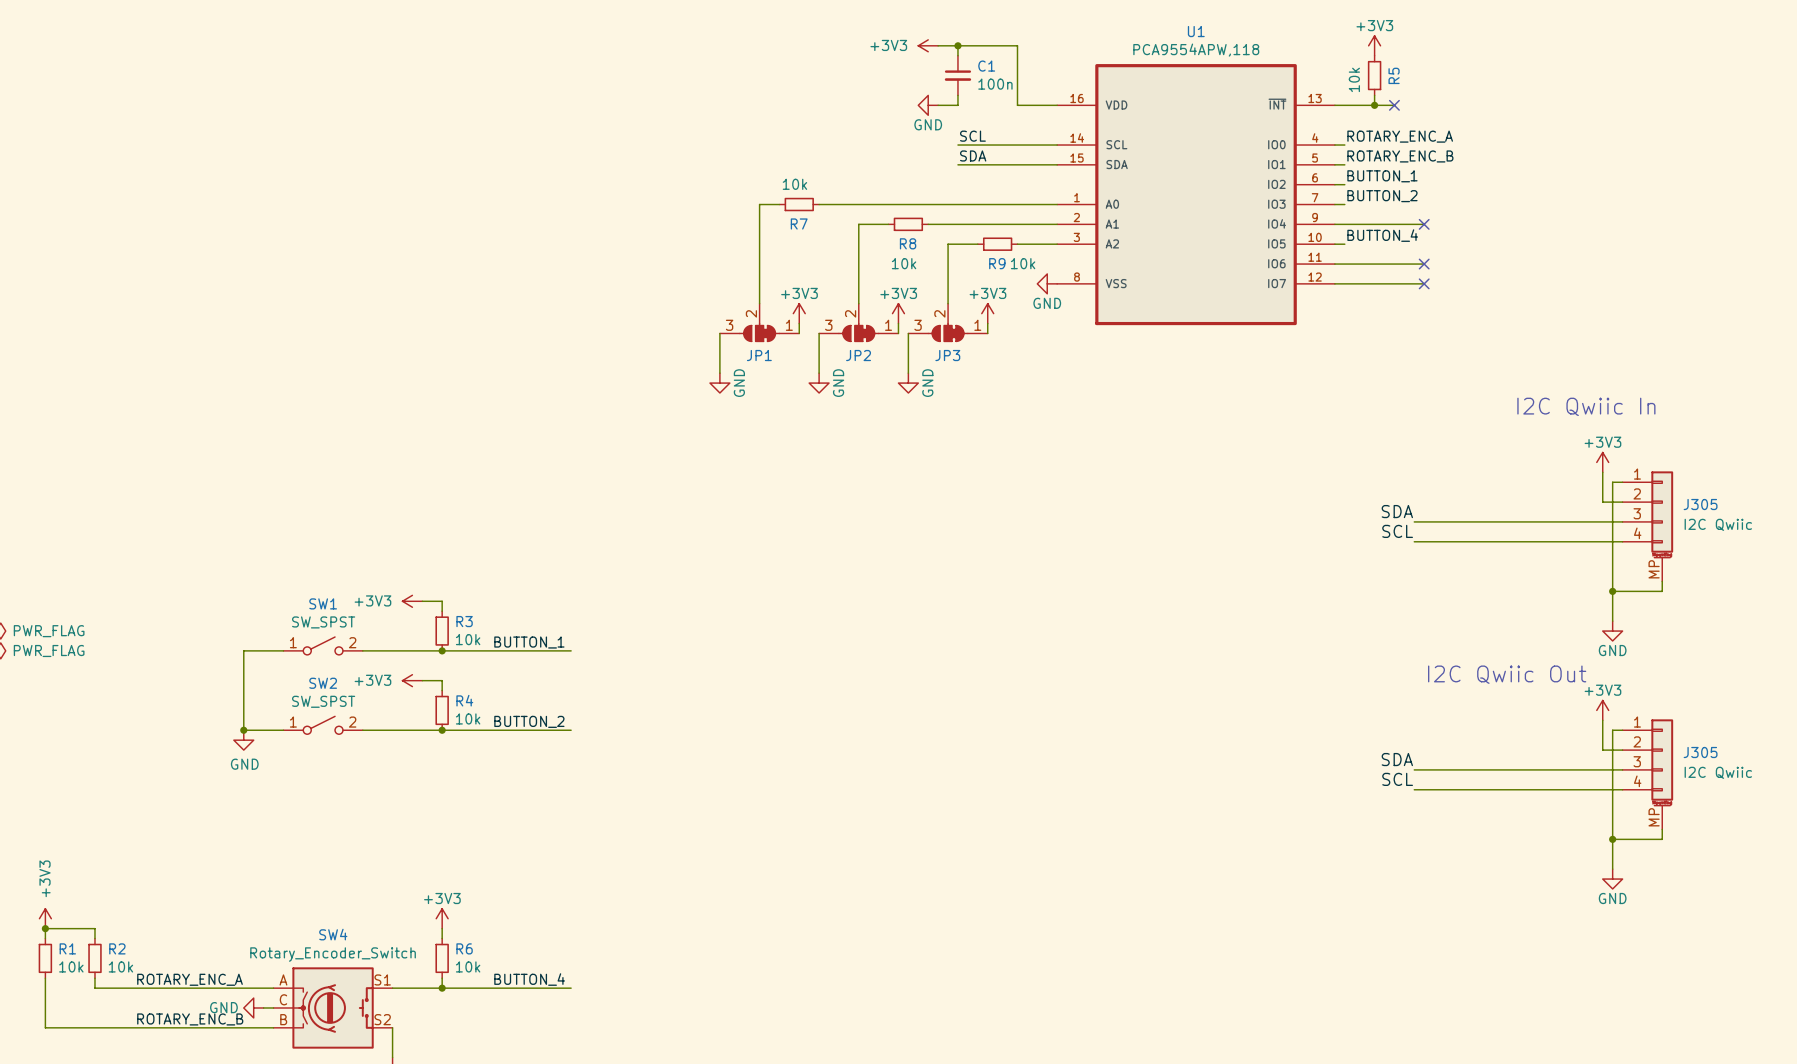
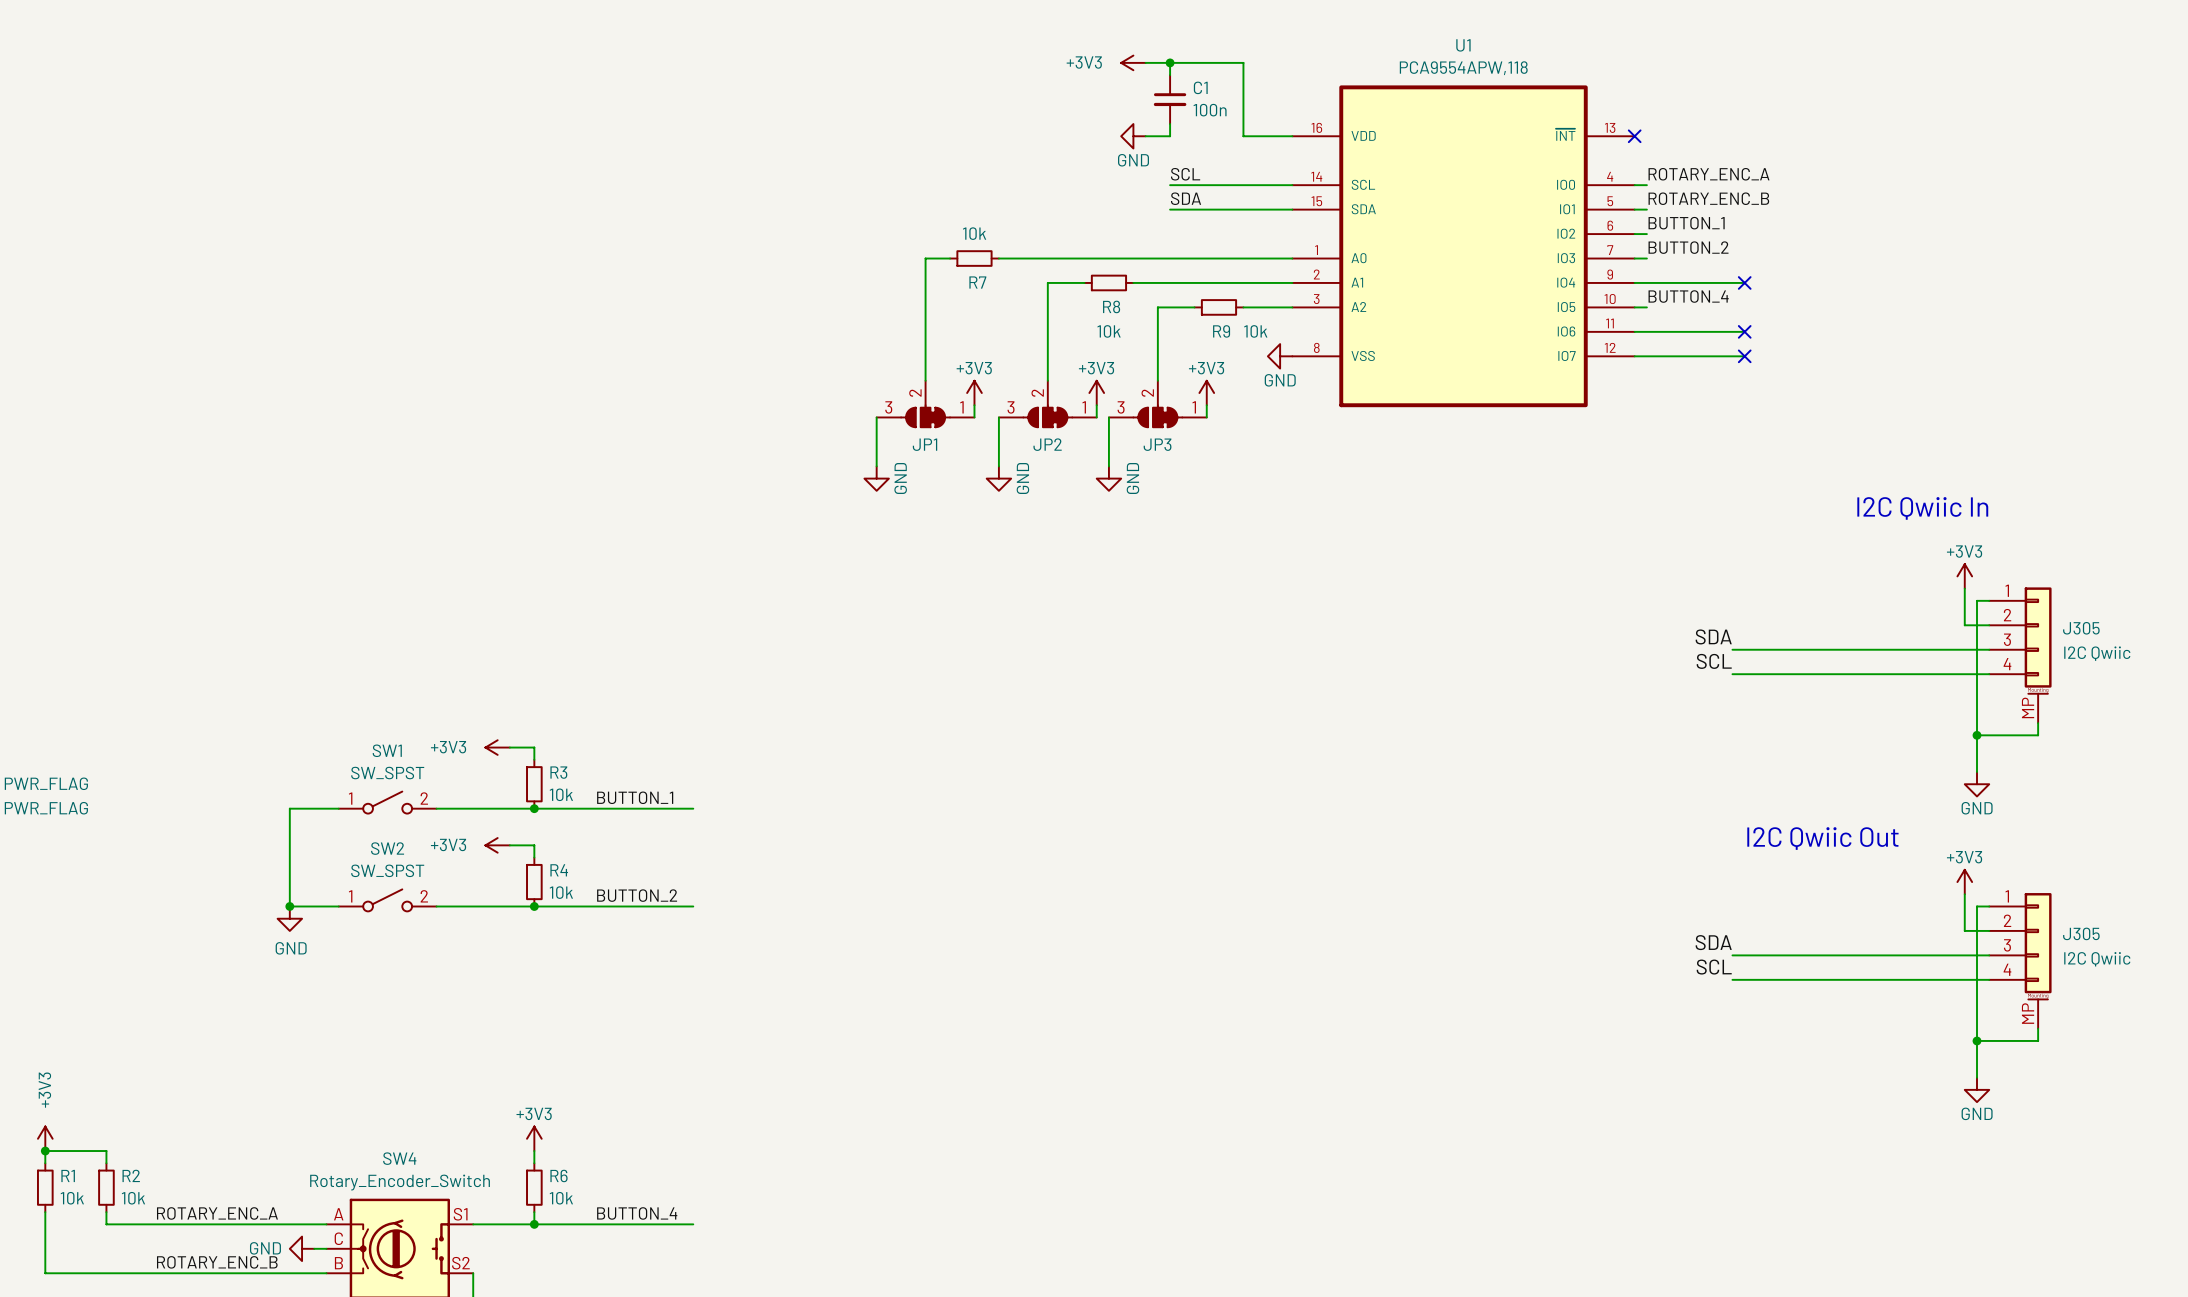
power symbol: +3V3 (1374, 45) -> none
R5: 10k (1374, 75) -> none
wire: (1374, 95) (1374, 105) -> none
wire: (1334, 105) (1394, 105) -> none
no-connect mark: none -> (1634, 136)
junction: (1374, 105) -> none
no-connect mark: (1394, 105) -> none

